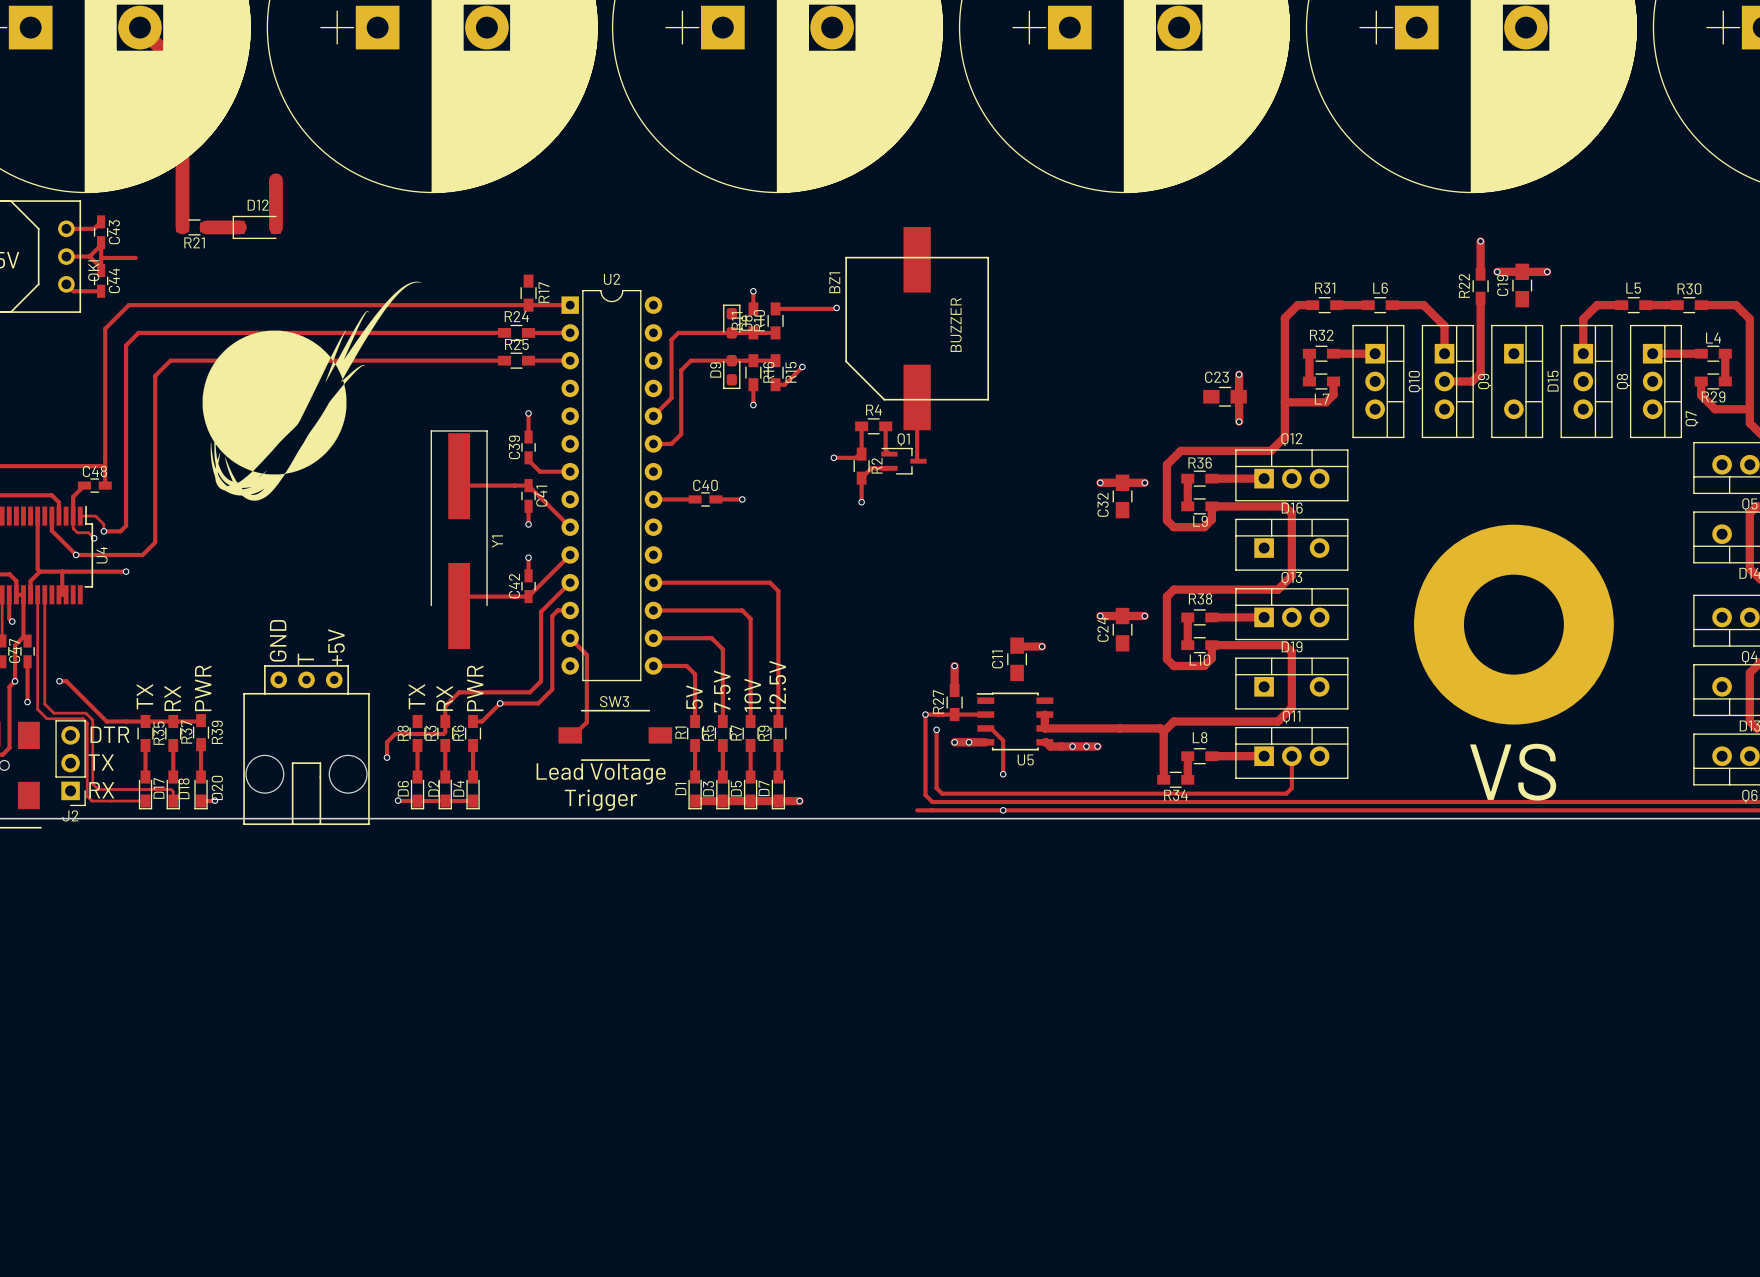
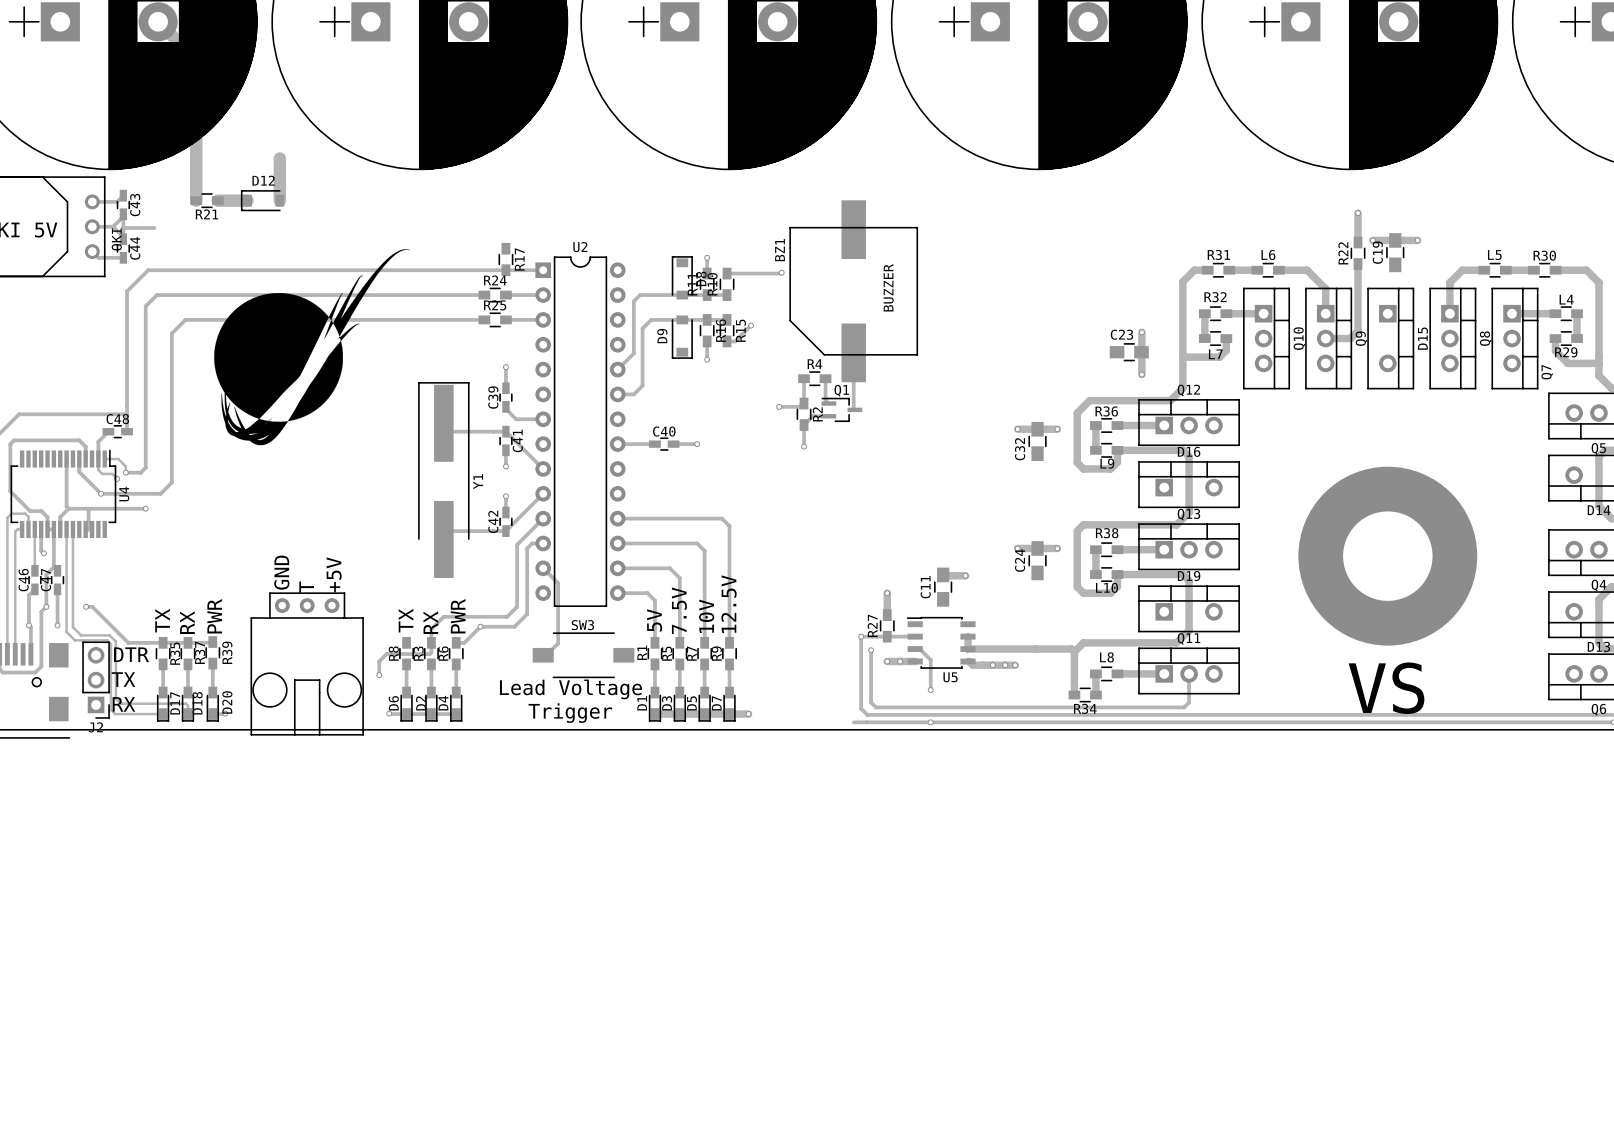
D8 footprint: [723, 304, 741, 339] -> [671, 256, 693, 300]
D9 footprint: [723, 354, 741, 390] -> [671, 315, 693, 359]

